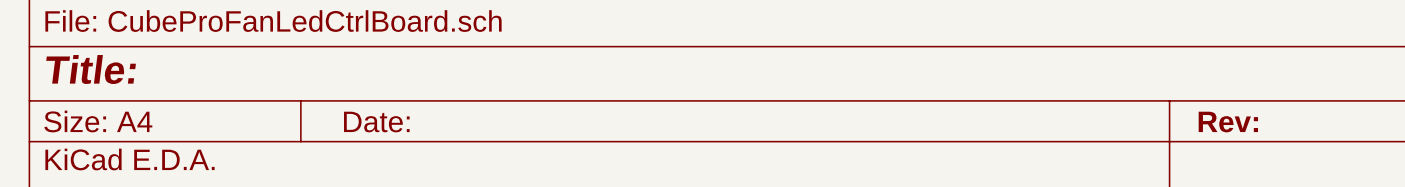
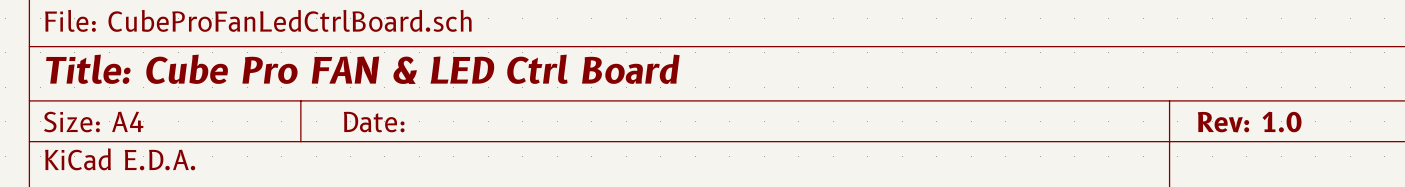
title block: Title: (91, 69) -> Title: Cube Pro FAN & LED Ctrl Board (362, 69)
title block: Rev: (1228, 122) -> Rev: 1.0 (1249, 122)

